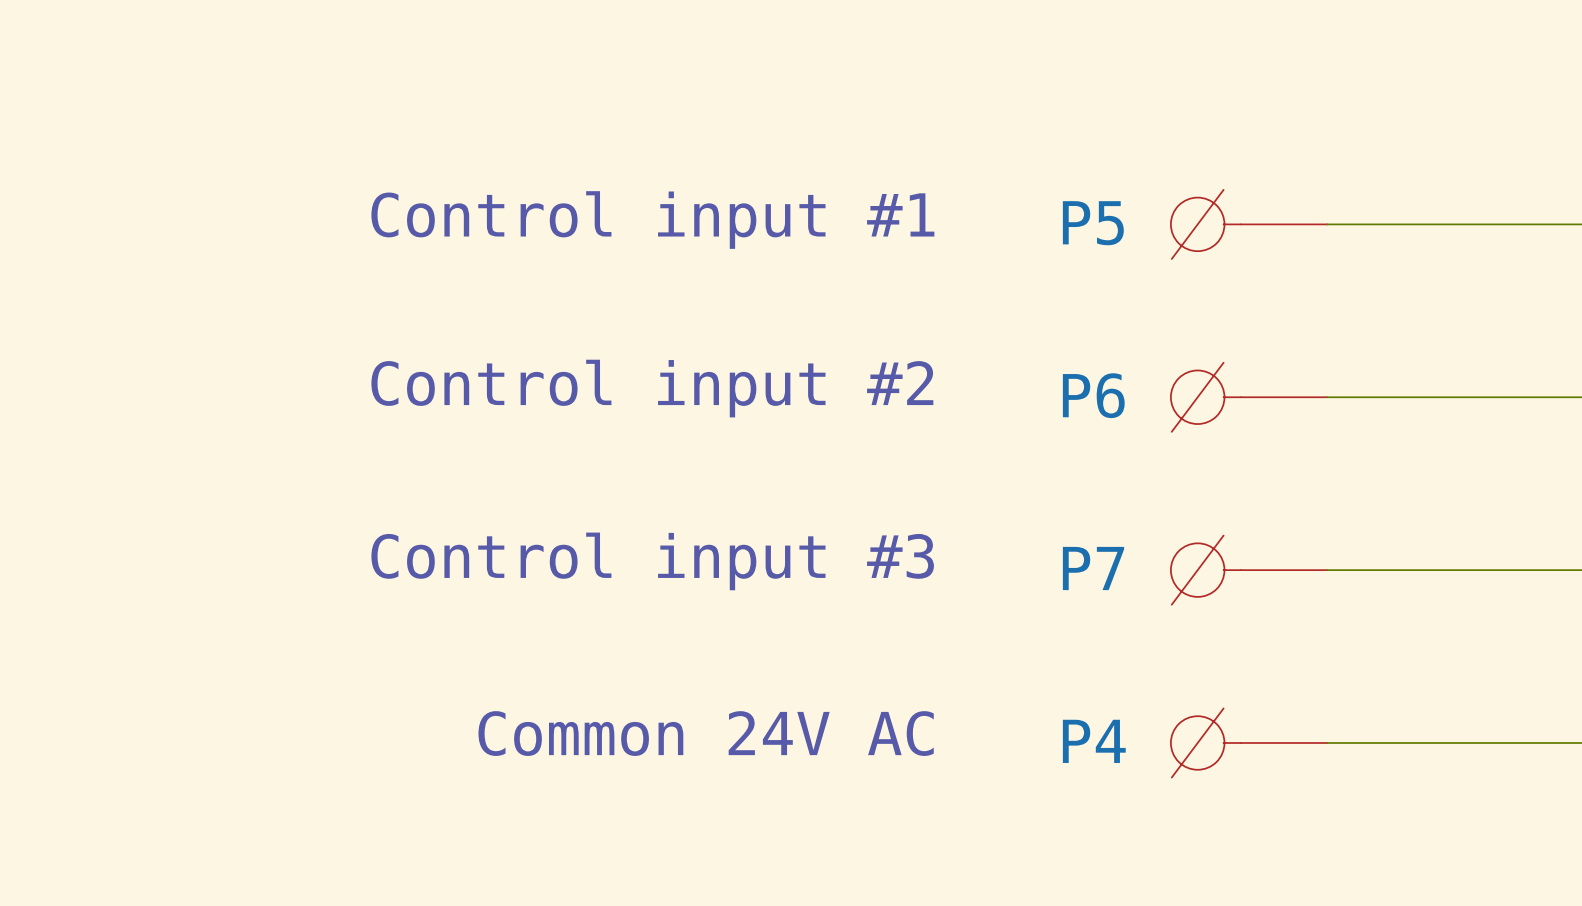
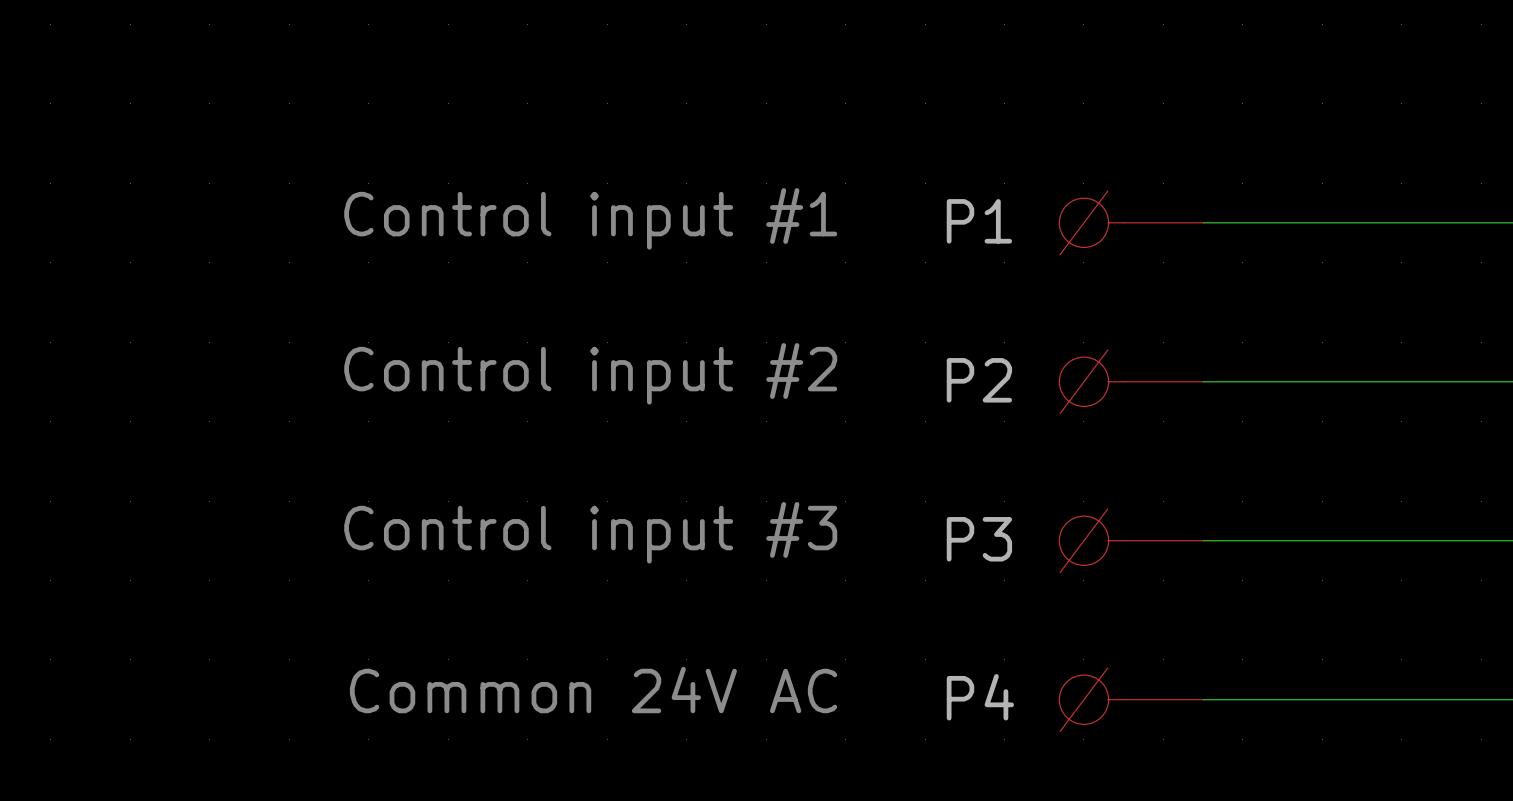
P5 name: P5 (1093, 223) -> P1 (979, 221)
P6 name: P6 (1093, 395) -> P2 (979, 380)
P7 name: P7 (1093, 568) -> P3 (979, 539)

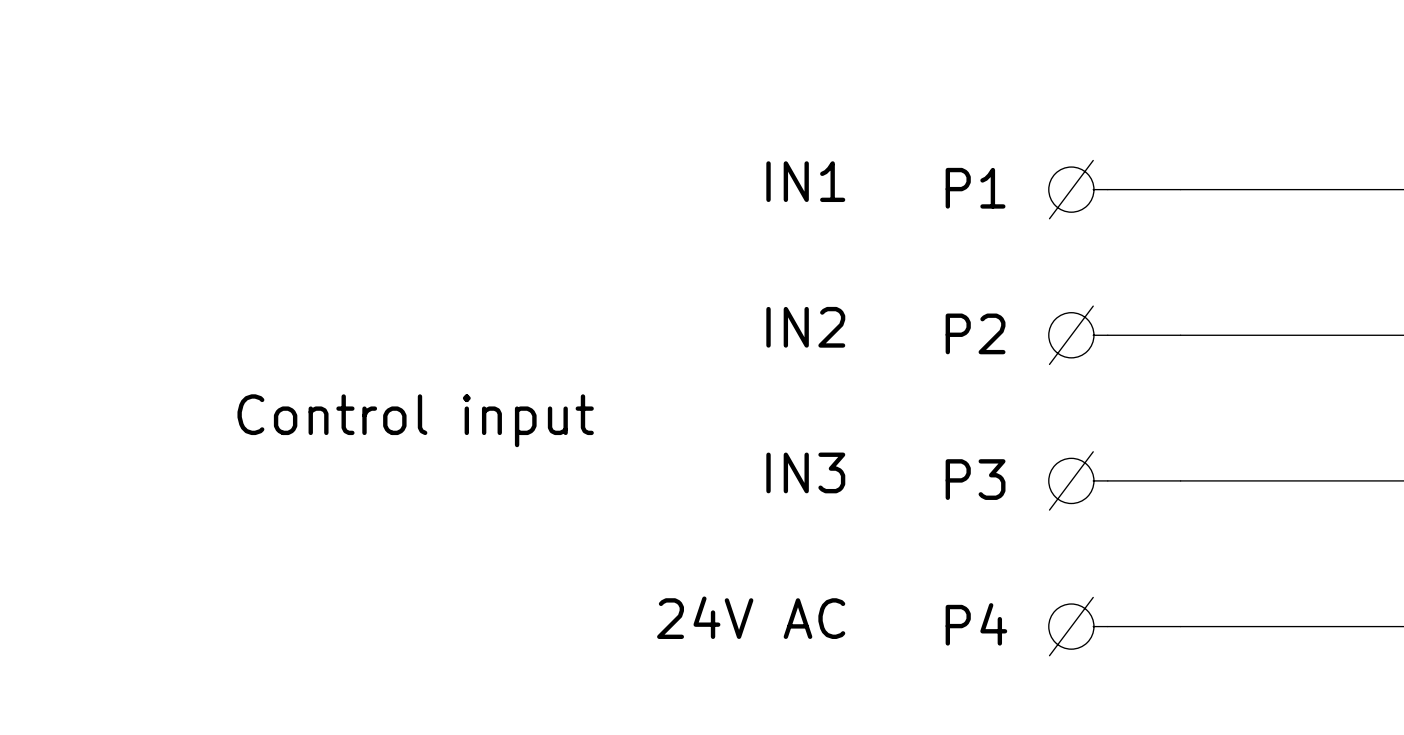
text: Control input #1 (590, 218) -> IN1 (805, 181)
text: Control input #2 (590, 373) -> IN2 (805, 327)
text: none -> Control input (415, 420)
text: Control input #3 (590, 532) -> IN3 (805, 472)
text: Common 24V AC (593, 690) -> 24V AC (751, 617)

